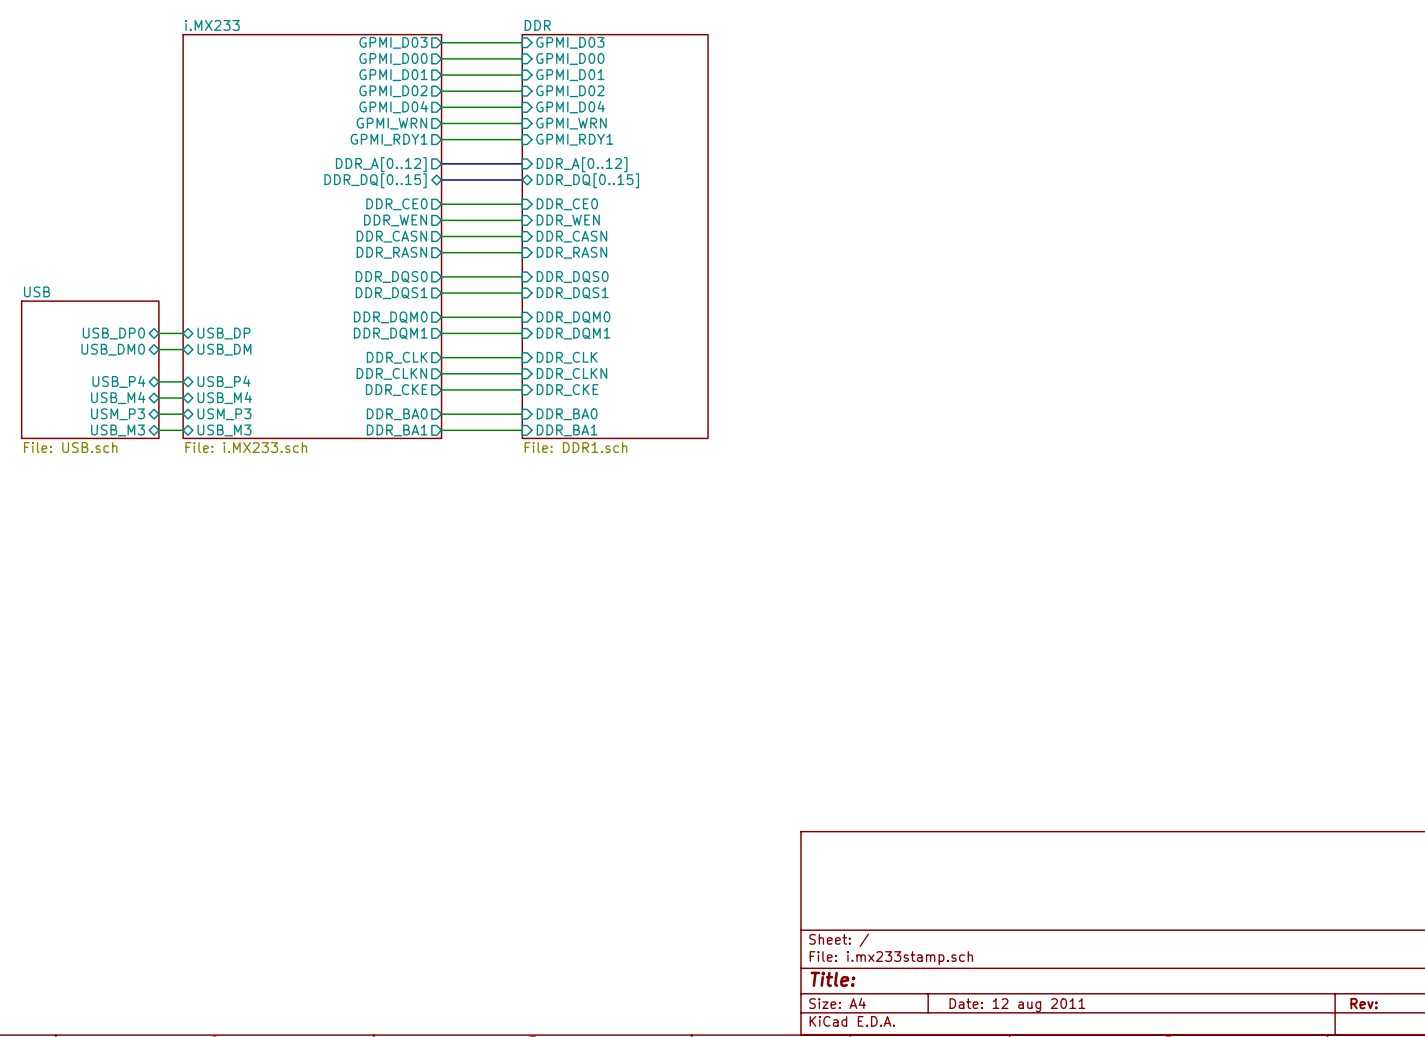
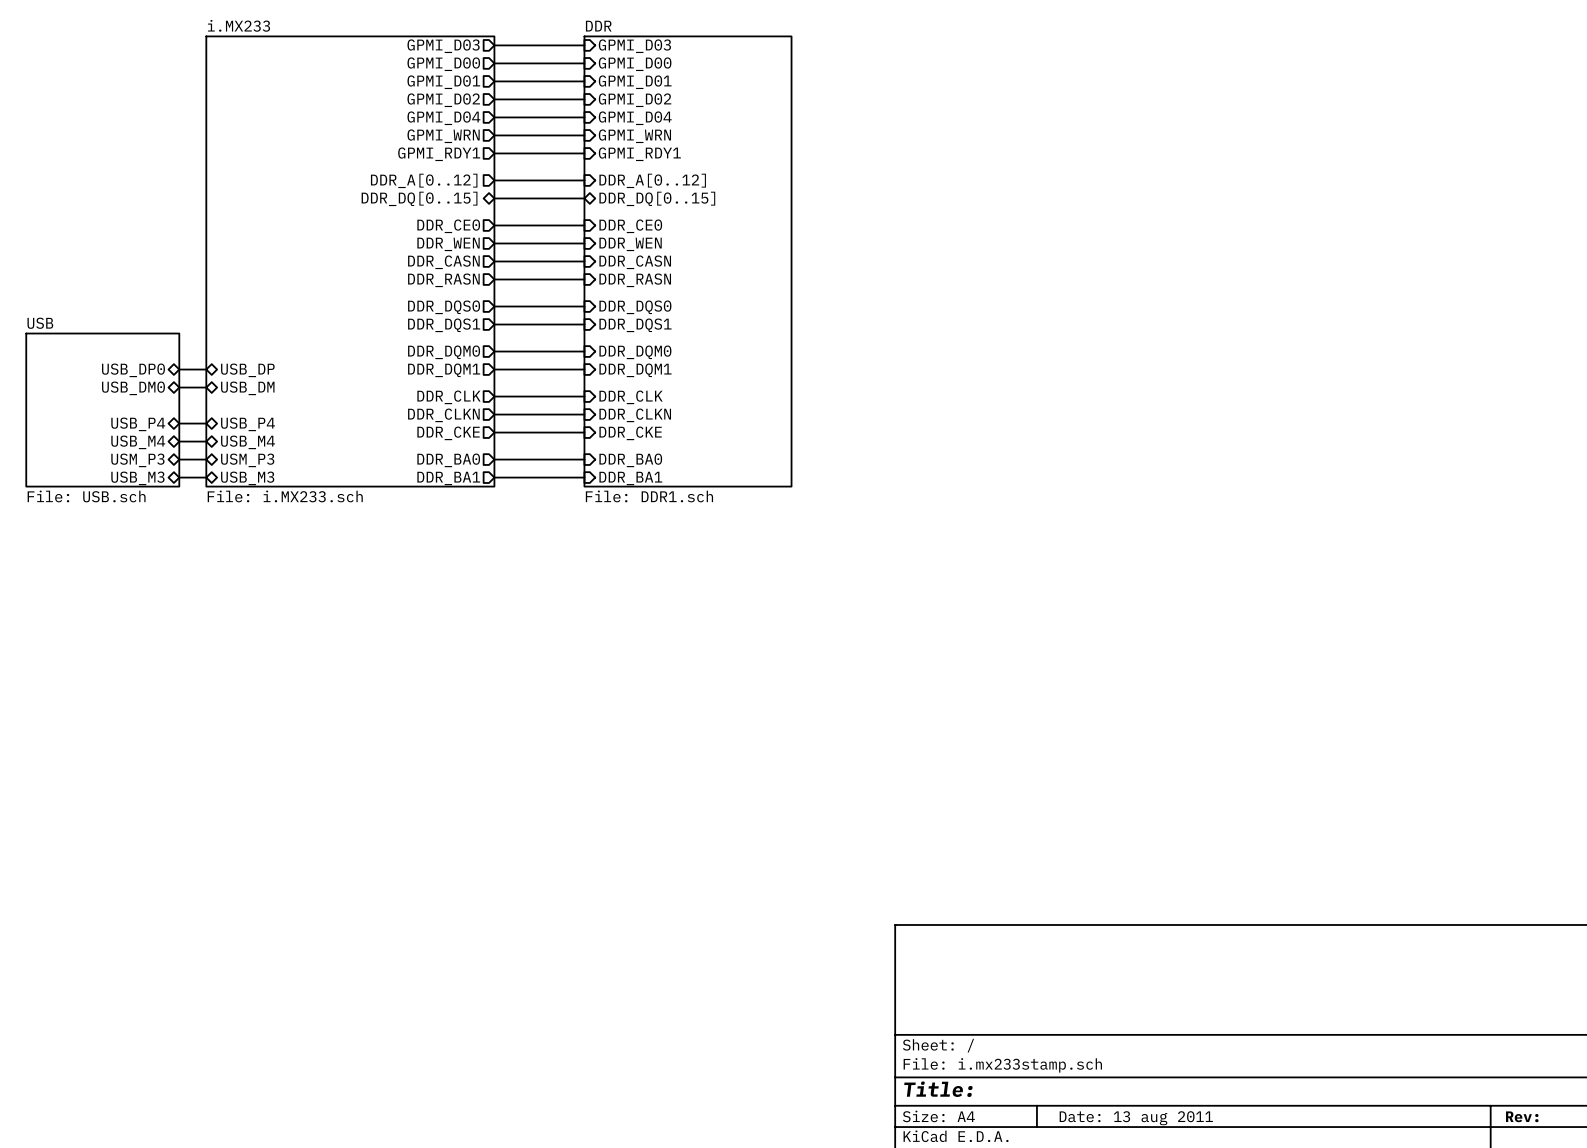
title block: Date: 12 aug 2011 (1017, 1005) -> Date: 13 aug 2011 (1136, 1118)

